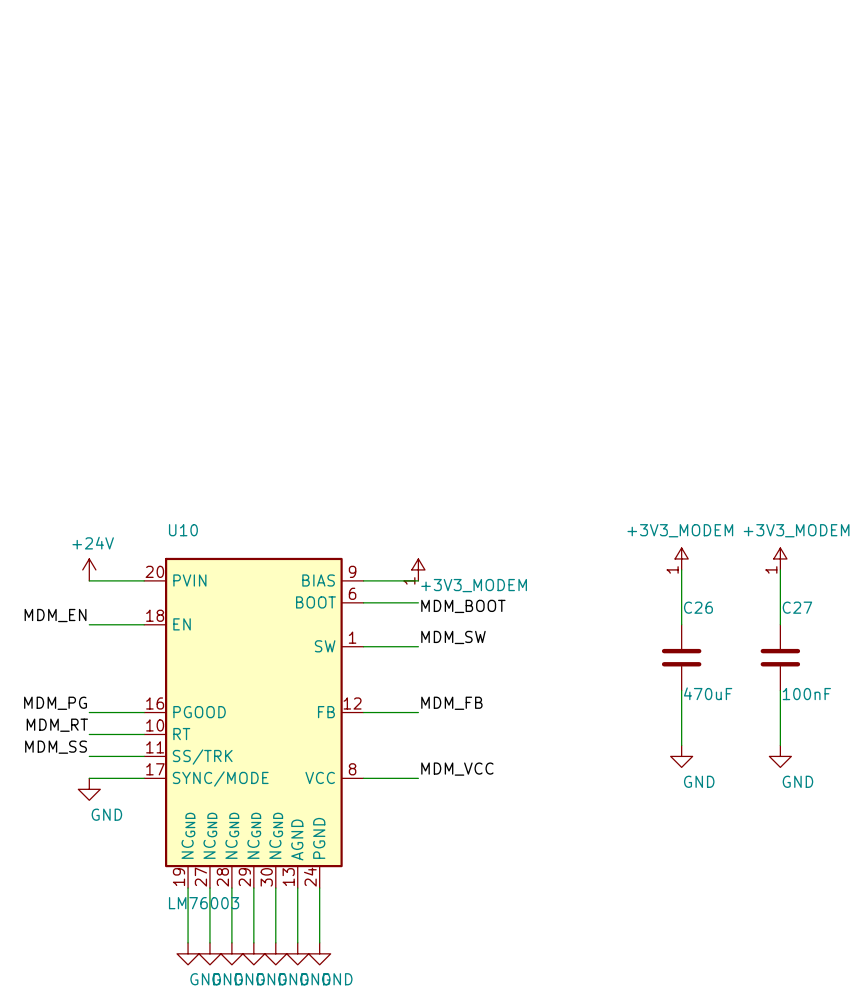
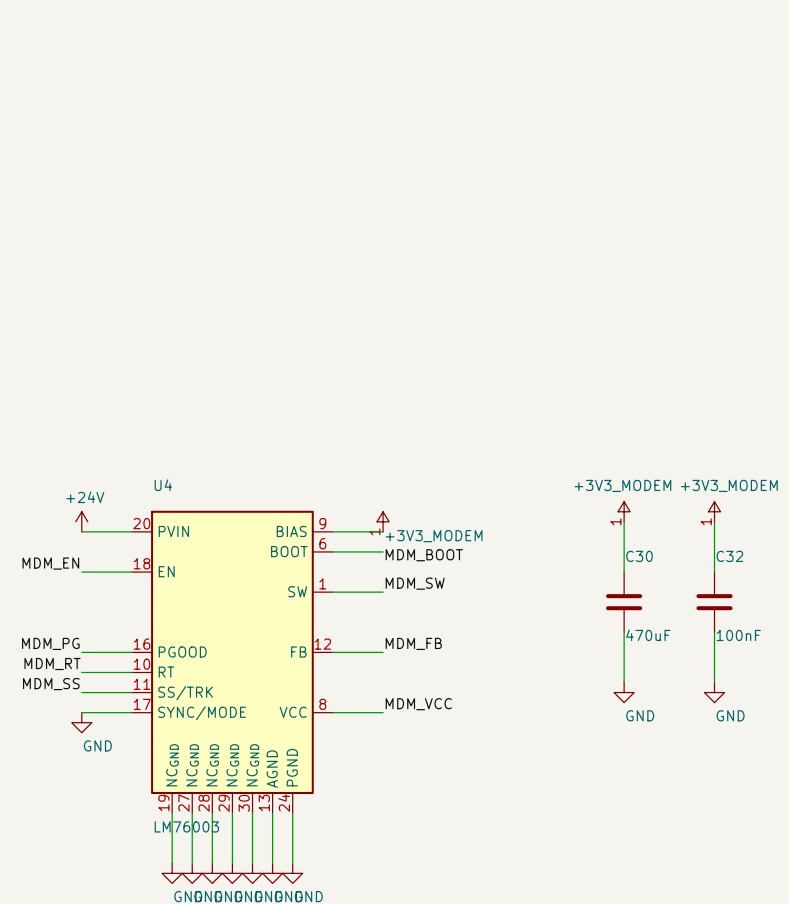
U10 name: U10 (183, 530) -> U4 (163, 485)
C26 name: C26 (698, 607) -> C30 (639, 556)
C27 name: C27 (797, 607) -> C32 (729, 556)

